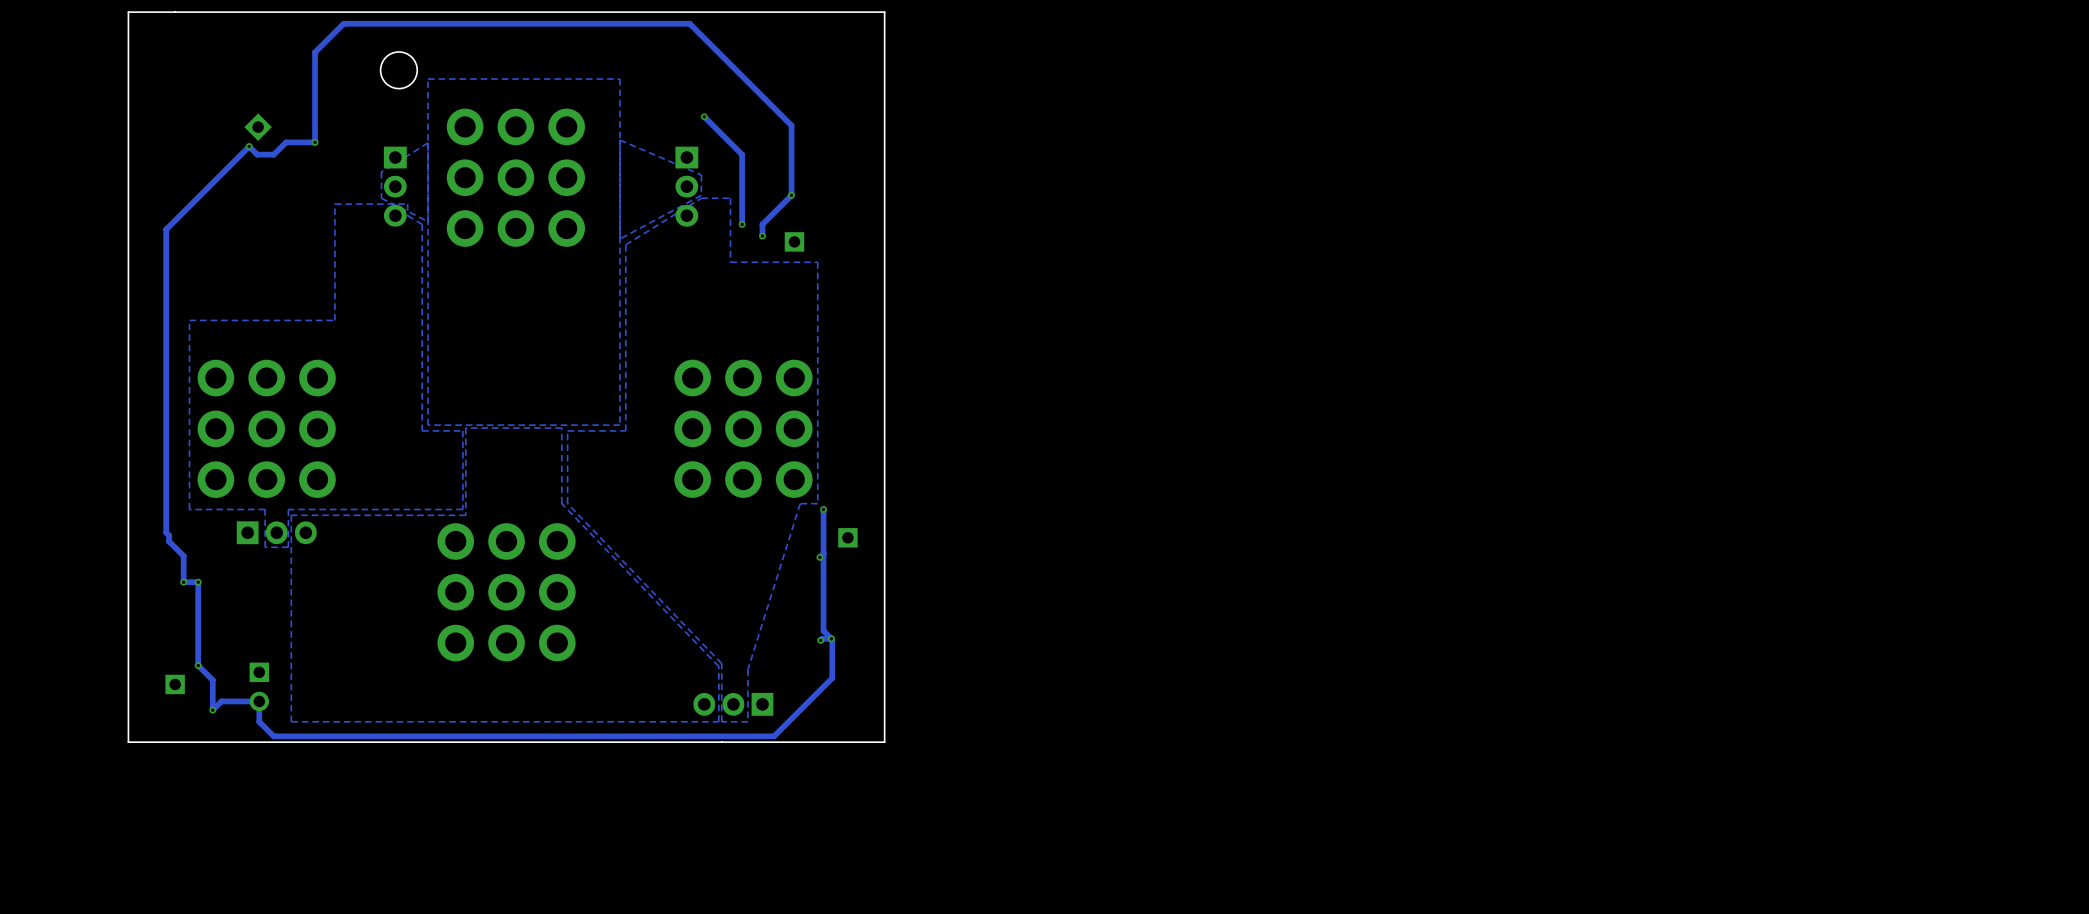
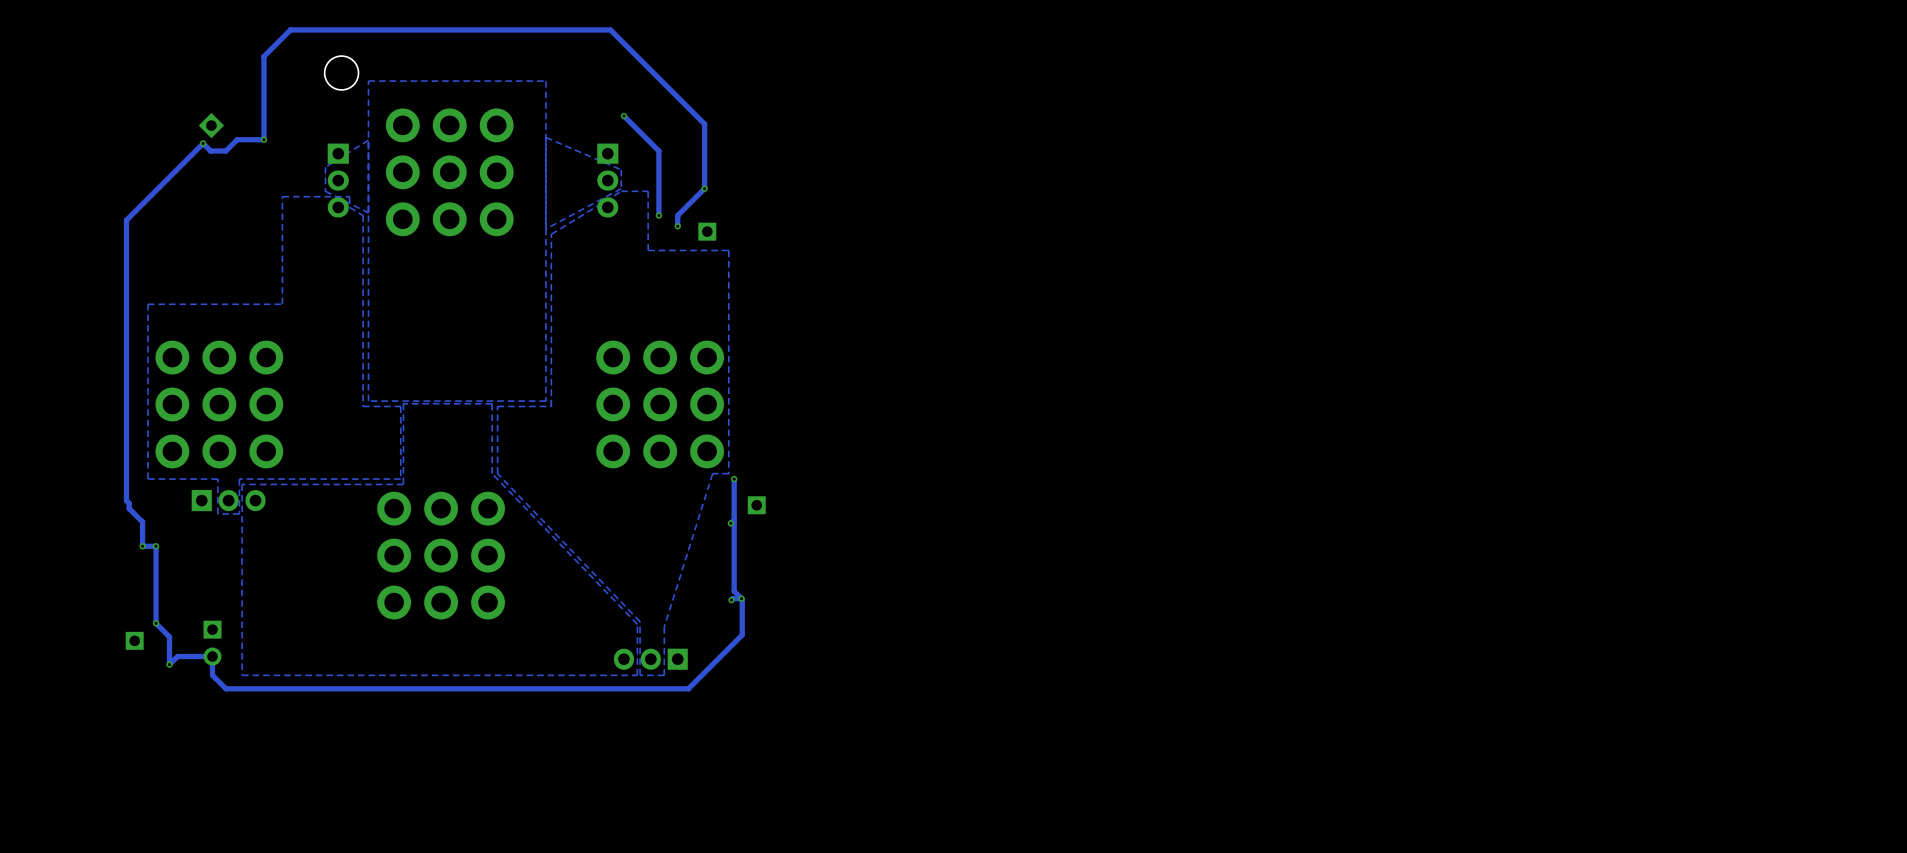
board edge: (884, 12) (128, 12) (128, 742) (884, 742) (884, 12) -> none

